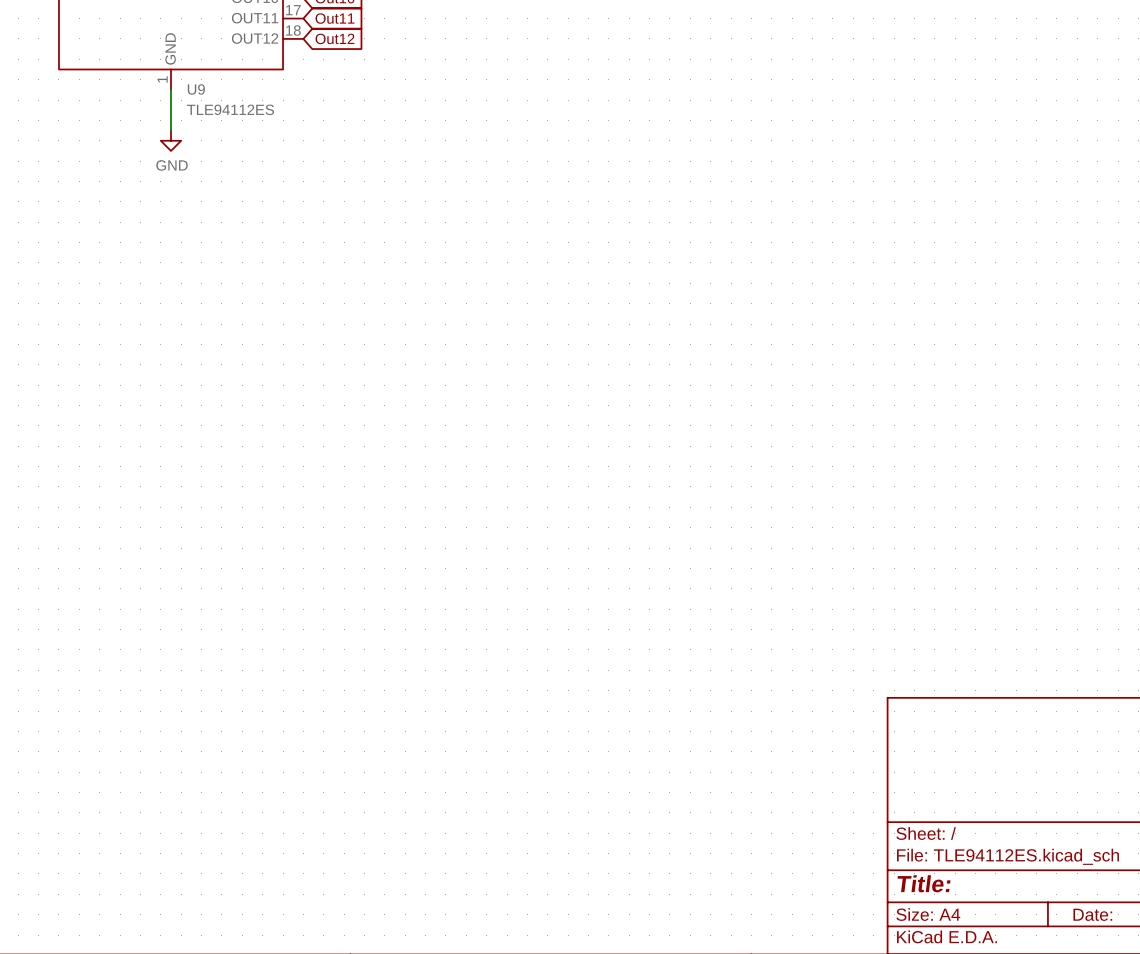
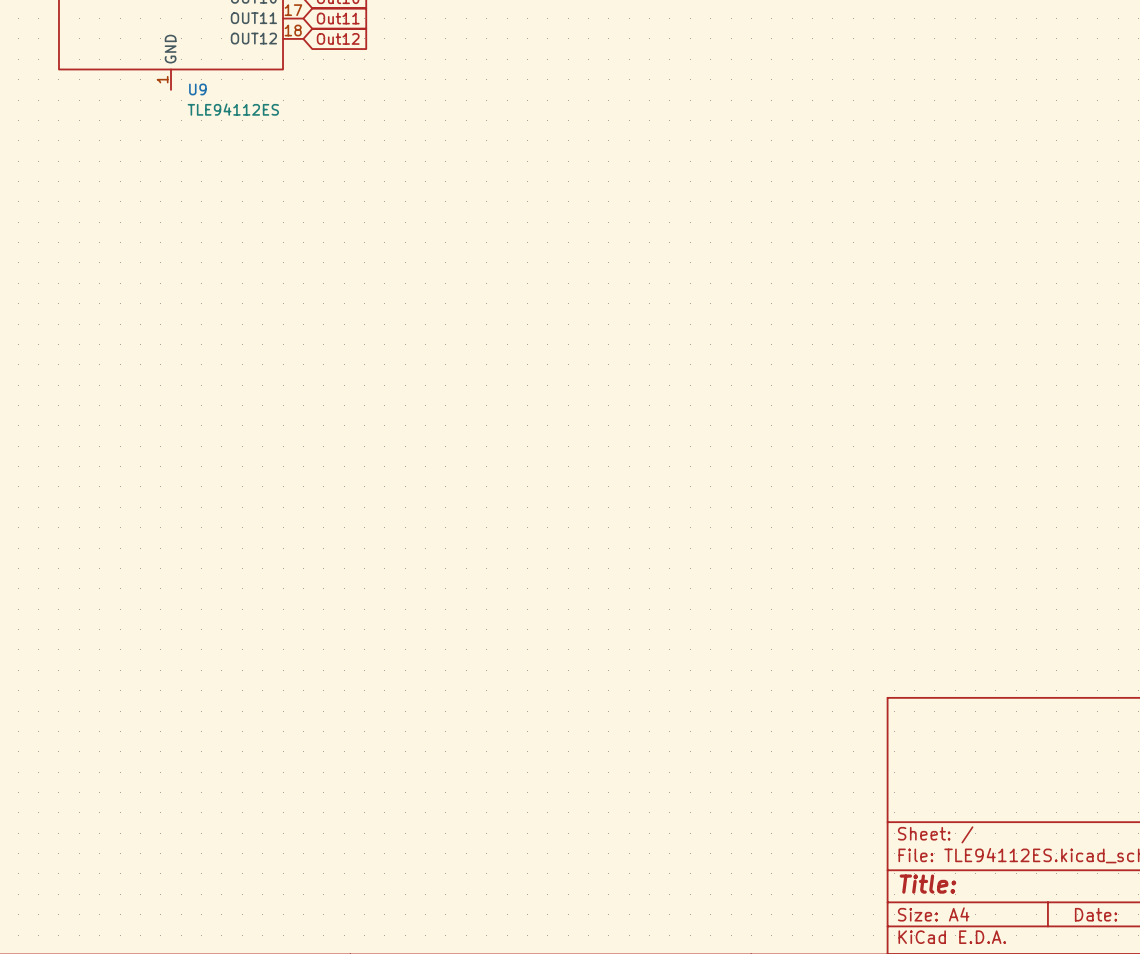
wire: (171, 89) (171, 130) -> none
power symbol: GND (171, 140) -> none

